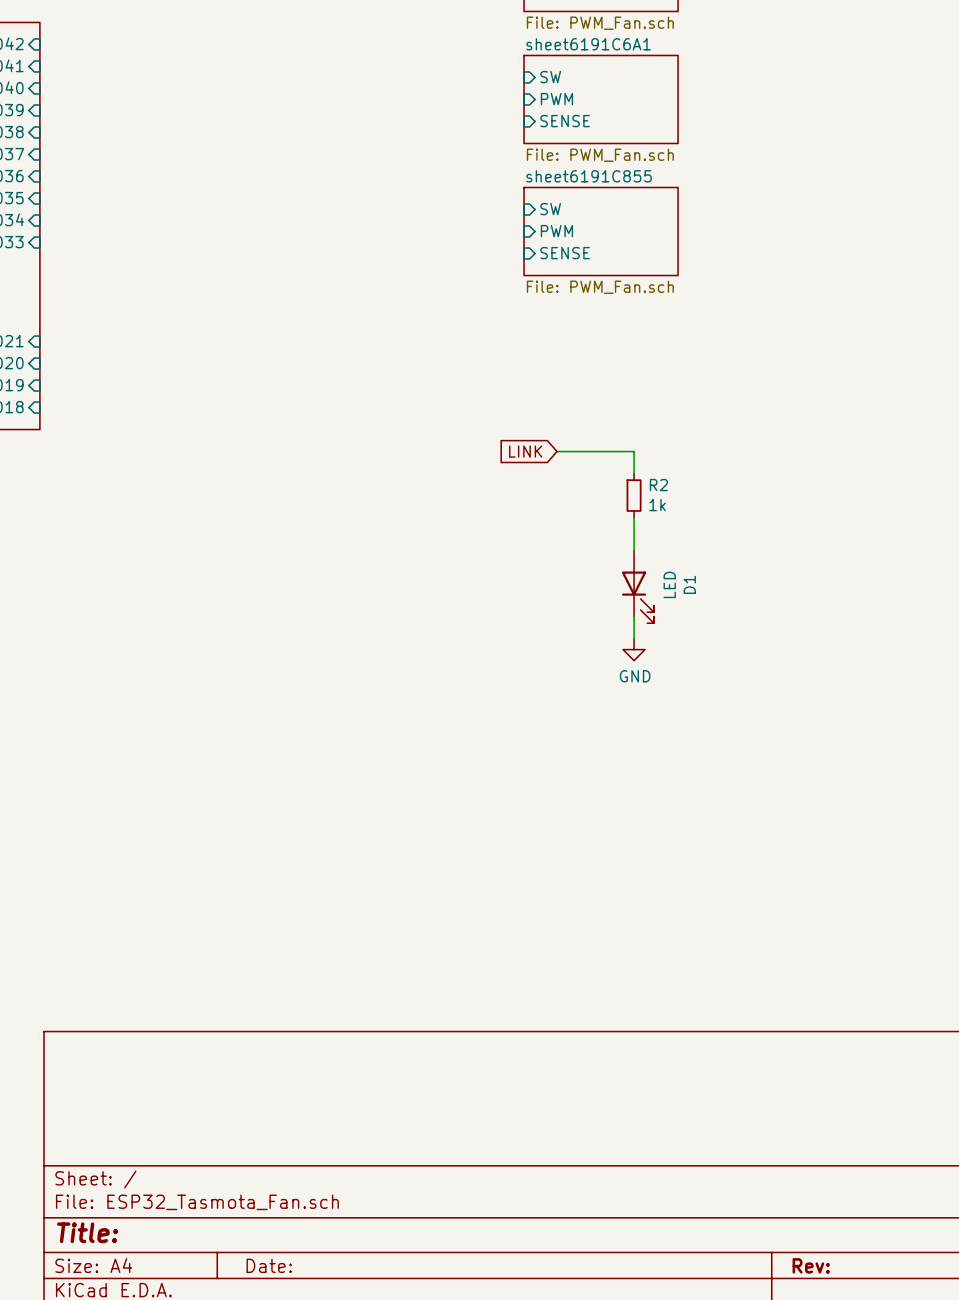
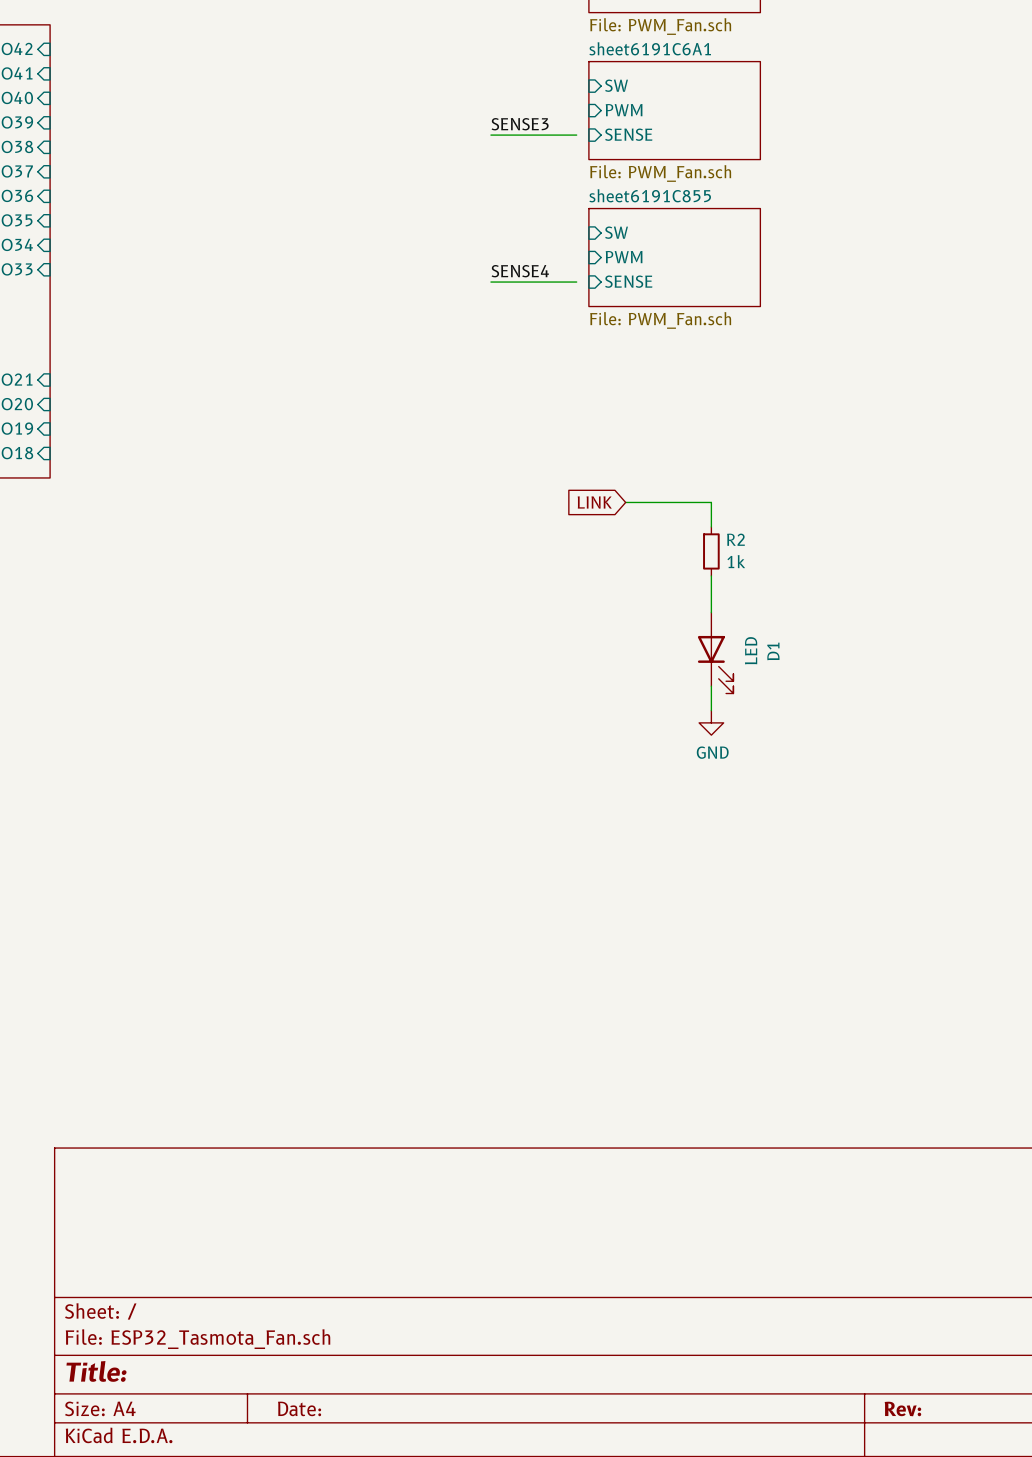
label: none -> SENSE3 (520, 124)
wire: none -> (490, 135) (576, 135)
label: none -> SENSE4 (520, 271)
wire: none -> (490, 282) (576, 282)

